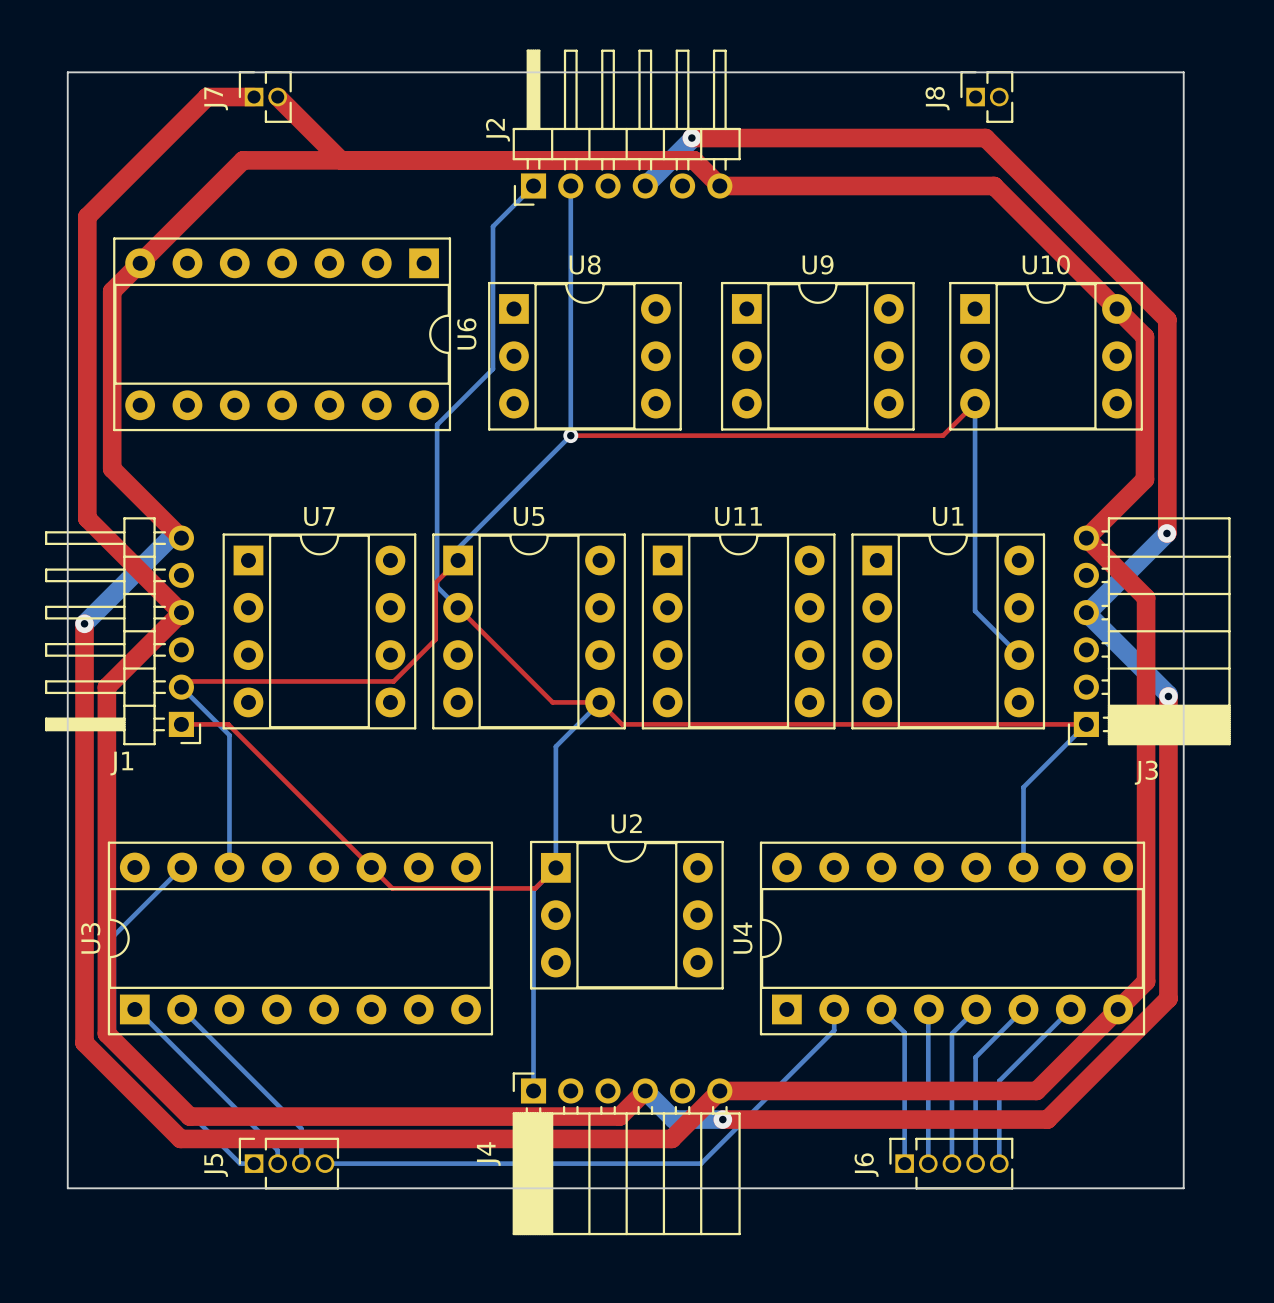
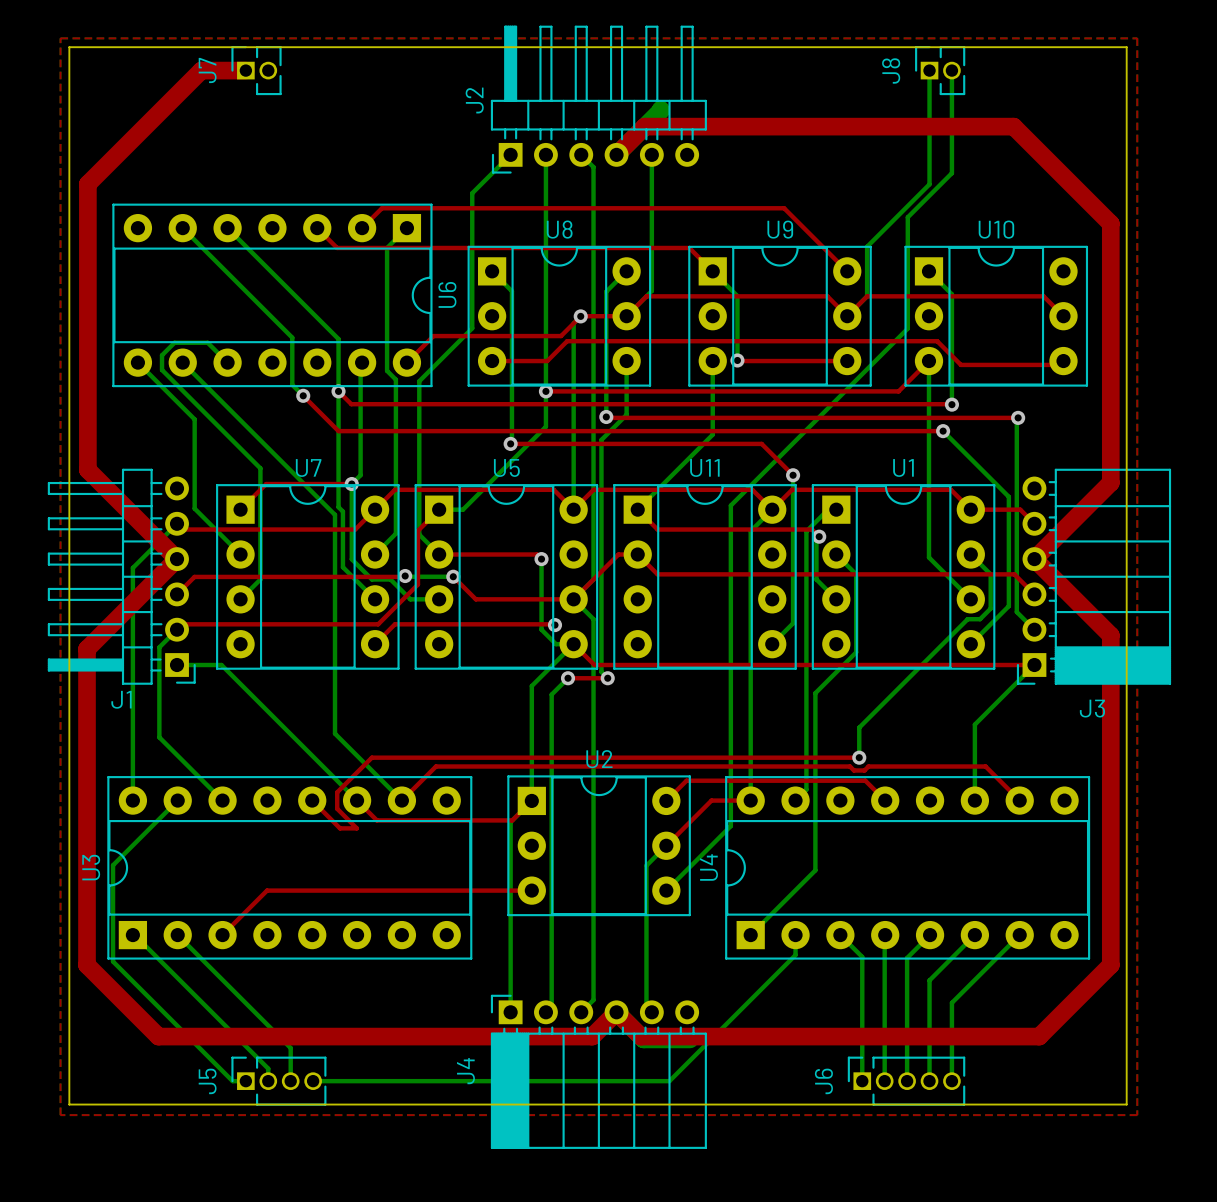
top zone outline: none -> (60, 38) (1137, 38) (1137, 1115) (60, 1115) (60, 38)
top track: (277, 97) (341, 160) -> none
bottom track: none -> (929, 70) (929, 184) (867, 246) (867, 296) (847, 316)
bottom track: none -> (951, 70) (951, 173) (907, 217) (907, 328) (730, 505) (730, 826) (666, 890)
top track: (691, 138) (985, 138) (1167, 319) (1166, 533) -> none
via: (691, 138) -> none
bottom track: none -> (581, 154) (593, 167) (593, 579) (573, 599) (593, 619) (593, 1000) (581, 1012)
top track: none -> (616, 154) (644, 126) (1013, 126) (1110, 223) (1110, 482) (1034, 559) (1110, 635) (1110, 965) (1039, 1036) (640, 1036) (616, 1012)
bottom track: none -> (651, 154) (651, 290) (626, 316)
bottom track: none -> (182, 228) (292, 337) (292, 384) (303, 395)
bottom track: none -> (227, 228) (338, 339) (338, 507) (342, 511) (342, 567) (375, 599)
top track: none -> (317, 228) (337, 247) (689, 247) (712, 271)
top track: none -> (362, 228) (381, 208) (784, 208) (847, 271)
bottom track: none -> (406, 228) (387, 247) (387, 370) (395, 379) (395, 533) (375, 554)
bottom track: none -> (492, 271) (511, 291) (510, 443)
bottom track: none -> (626, 271) (606, 291) (606, 416)
bottom track: none -> (712, 271) (737, 296) (737, 360)
bottom track: none -> (928, 271) (951, 294) (951, 404)
bottom track: none -> (580, 316) (573, 323) (573, 509)
via: none -> (580, 316)
top track: none -> (1063, 316) (1043, 296) (867, 296) (847, 316) (827, 296) (646, 296) (626, 316) (580, 316) (561, 336) (433, 336) (406, 362)
top track: none -> (737, 360) (847, 361)
via: none -> (737, 360)
top track: none -> (492, 361) (547, 361) (567, 341) (937, 341) (960, 364) (1059, 364) (1063, 361)
bottom track: none -> (626, 361) (626, 414) (601, 439) (601, 671) (607, 678)
bottom track: none -> (712, 361) (712, 434) (637, 509)
bottom track: none -> (137, 362) (194, 419) (194, 508) (240, 554)
bottom track: none -> (182, 362) (335, 514) (335, 733) (401, 800)
bottom track: none -> (227, 362) (207, 342) (174, 342) (162, 355) (162, 369) (260, 468) (260, 579) (240, 599)
bottom track: none -> (362, 362) (360, 475) (351, 484) (351, 559) (371, 579) (390, 579) (410, 599) (439, 599)
top track: none -> (338, 391) (351, 404) (951, 404)
via: none -> (338, 391)
bottom track: (570, 435) (458, 548) (458, 560) -> (545, 391) (545, 426) (462, 509) (439, 509)
top track: none -> (303, 395) (338, 431) (943, 431)
via: none -> (303, 395)
via: none -> (951, 404)
top track: none -> (606, 416) (1018, 417)
via: none -> (606, 416)
bottom track: none -> (1018, 417) (1016, 612) (1034, 629)
via: none -> (1018, 417)
bottom track: none -> (943, 431) (1008, 496) (1008, 606) (970, 644)
via: none -> (943, 431)
top track: none -> (510, 443) (761, 443) (793, 475)
via: none -> (510, 443)
bottom track: none -> (793, 475) (793, 623) (772, 644)
via: none -> (793, 475)
top track: none -> (351, 484) (266, 484) (240, 509)
via: none -> (351, 484)
bottom track: (1166, 533) (1087, 612) -> none
via: (1166, 533) -> none
top track: (181, 538) (112, 468) (112, 291) (243, 160) (694, 160) (719, 185) (994, 185) (1144, 336) (1144, 479) (1086, 538) (1146, 597) (1146, 981) (1036, 1090) (719, 1090) (671, 1138) (180, 1138) (84, 1042) (84, 623) -> none
bottom track: (181, 538) (170, 538) (84, 623) -> none
top track: none -> (637, 509) (657, 529) (812, 529) (819, 536)
bottom track: none -> (772, 509) (750, 531) (750, 800)
bottom track: none -> (836, 509) (828, 509) (806, 531) (806, 789) (795, 800)
top track: none -> (177, 523) (182, 529) (355, 529) (394, 489) (553, 489) (573, 509) (593, 489) (752, 489) (772, 509) (792, 489) (950, 489) (970, 509) (1020, 509) (1034, 523)
bottom track: none -> (177, 523) (132, 567) (132, 800)
bottom track: none -> (819, 536) (816, 539) (816, 579) (836, 599)
via: none -> (819, 536)
top track: (458, 607) (552, 702) (600, 702) -> (439, 554) (536, 554) (541, 559)
bottom track: none -> (836, 554) (856, 574) (856, 652) (815, 693) (815, 870) (750, 935)
bottom track: none -> (970, 554) (990, 574) (990, 608) (980, 619) (967, 619) (859, 727) (859, 757)
bottom track: none -> (541, 559) (541, 629) (556, 644) (573, 644)
via: none -> (541, 559)
bottom track: (1086, 612) (1168, 696) -> none
via: (84, 623) -> none
top track: none -> (405, 576) (194, 576) (177, 594)
bottom track: none -> (405, 576) (453, 576)
via: none -> (405, 576)
top track: none -> (453, 576) (475, 599) (573, 599) (618, 554) (637, 554) (657, 574) (1014, 574) (1034, 594)
via: none -> (453, 576)
top track: none -> (554, 625) (394, 624) (375, 644)
via: none -> (554, 625)
top track: (106, 687) (106, 1033) (189, 1116) -> (106, 629) (87, 649) (87, 965) (158, 1036) (184, 1036)
bottom track: (181, 687) (229, 735) (229, 867) -> (177, 629) (159, 647) (159, 737) (222, 800)
top track: (1168, 696) (1168, 998) (1047, 1119) (722, 1119) -> none
via: (1168, 696) -> none
top track: (181, 724) (228, 724) (371, 867) -> none
bottom track: none -> (177, 665) (221, 665) (357, 800)
top track: none -> (568, 678) (607, 678)
bottom track: none -> (568, 678) (551, 694) (551, 1006) (545, 1012)
via: none -> (568, 678)
via: none -> (607, 678)
top track: none -> (859, 757) (371, 757) (337, 792) (337, 808) (356, 828) (340, 828) (312, 800)
via: none -> (859, 757)
top track: none -> (401, 800) (435, 766) (849, 766) (853, 770) (864, 770) (868, 766) (985, 766) (1019, 800)
top track: none -> (750, 800) (711, 800) (666, 845)
top track: none -> (885, 800) (865, 780) (686, 780) (666, 800)
bottom track: none -> (666, 845) (646, 865) (646, 1006) (651, 1012)
top track: none -> (531, 890) (267, 890) (222, 935)
via: (722, 1119) -> none

